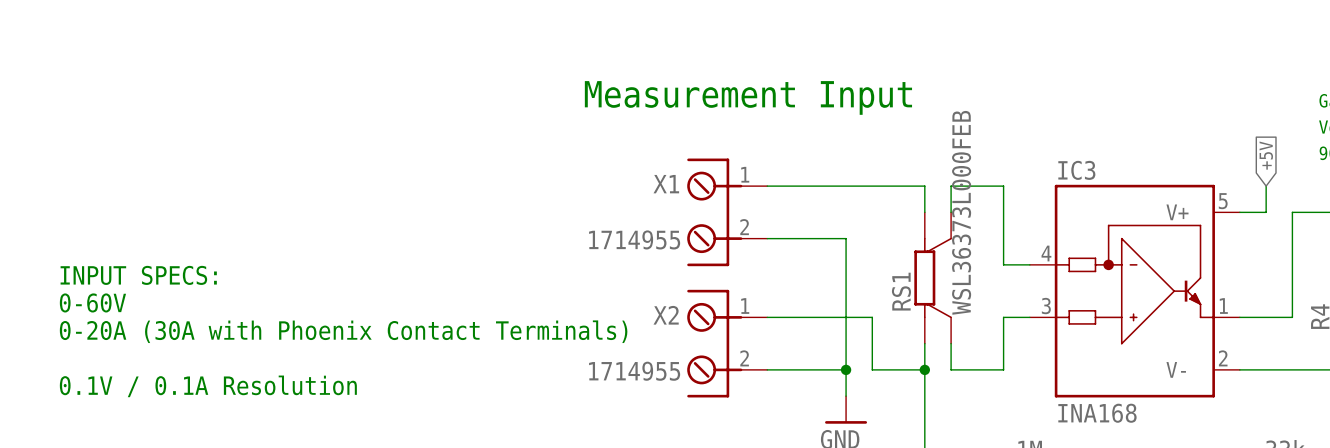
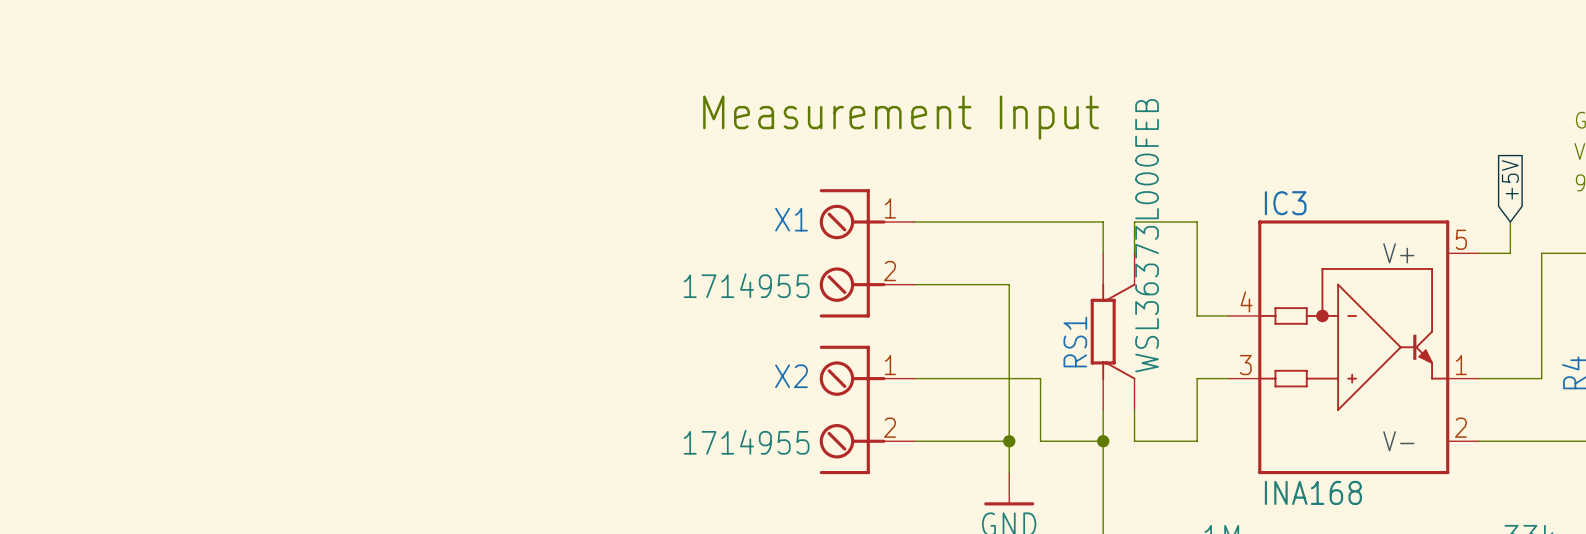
text: INPUT SPECS: (138, 275) -> none
text: 0-60V (92, 302) -> none
text: 0-20A (30A with Phoenix Contact Terminals) (343, 331) -> none
text: 0.1V / 0.1A Resolution (208, 386) -> none

